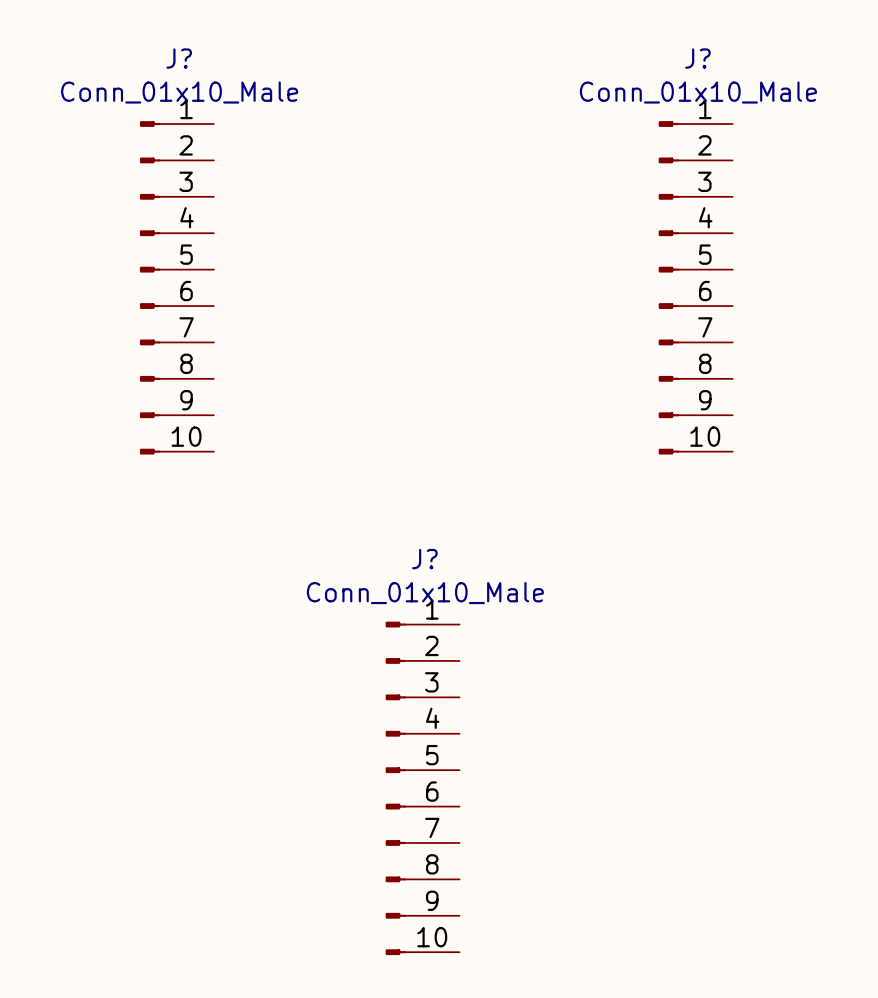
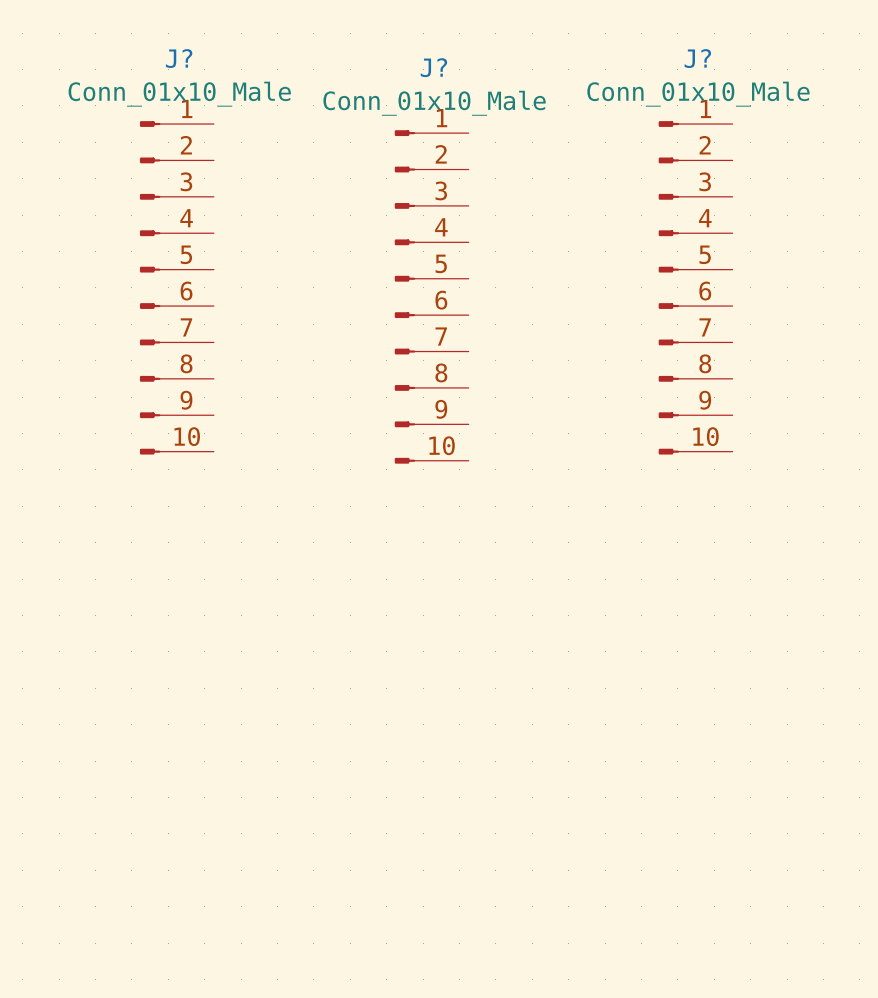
J?: none -> Conn_01x10_Male (431, 296)
J?: Conn_01x10_Male (422, 788) -> none

